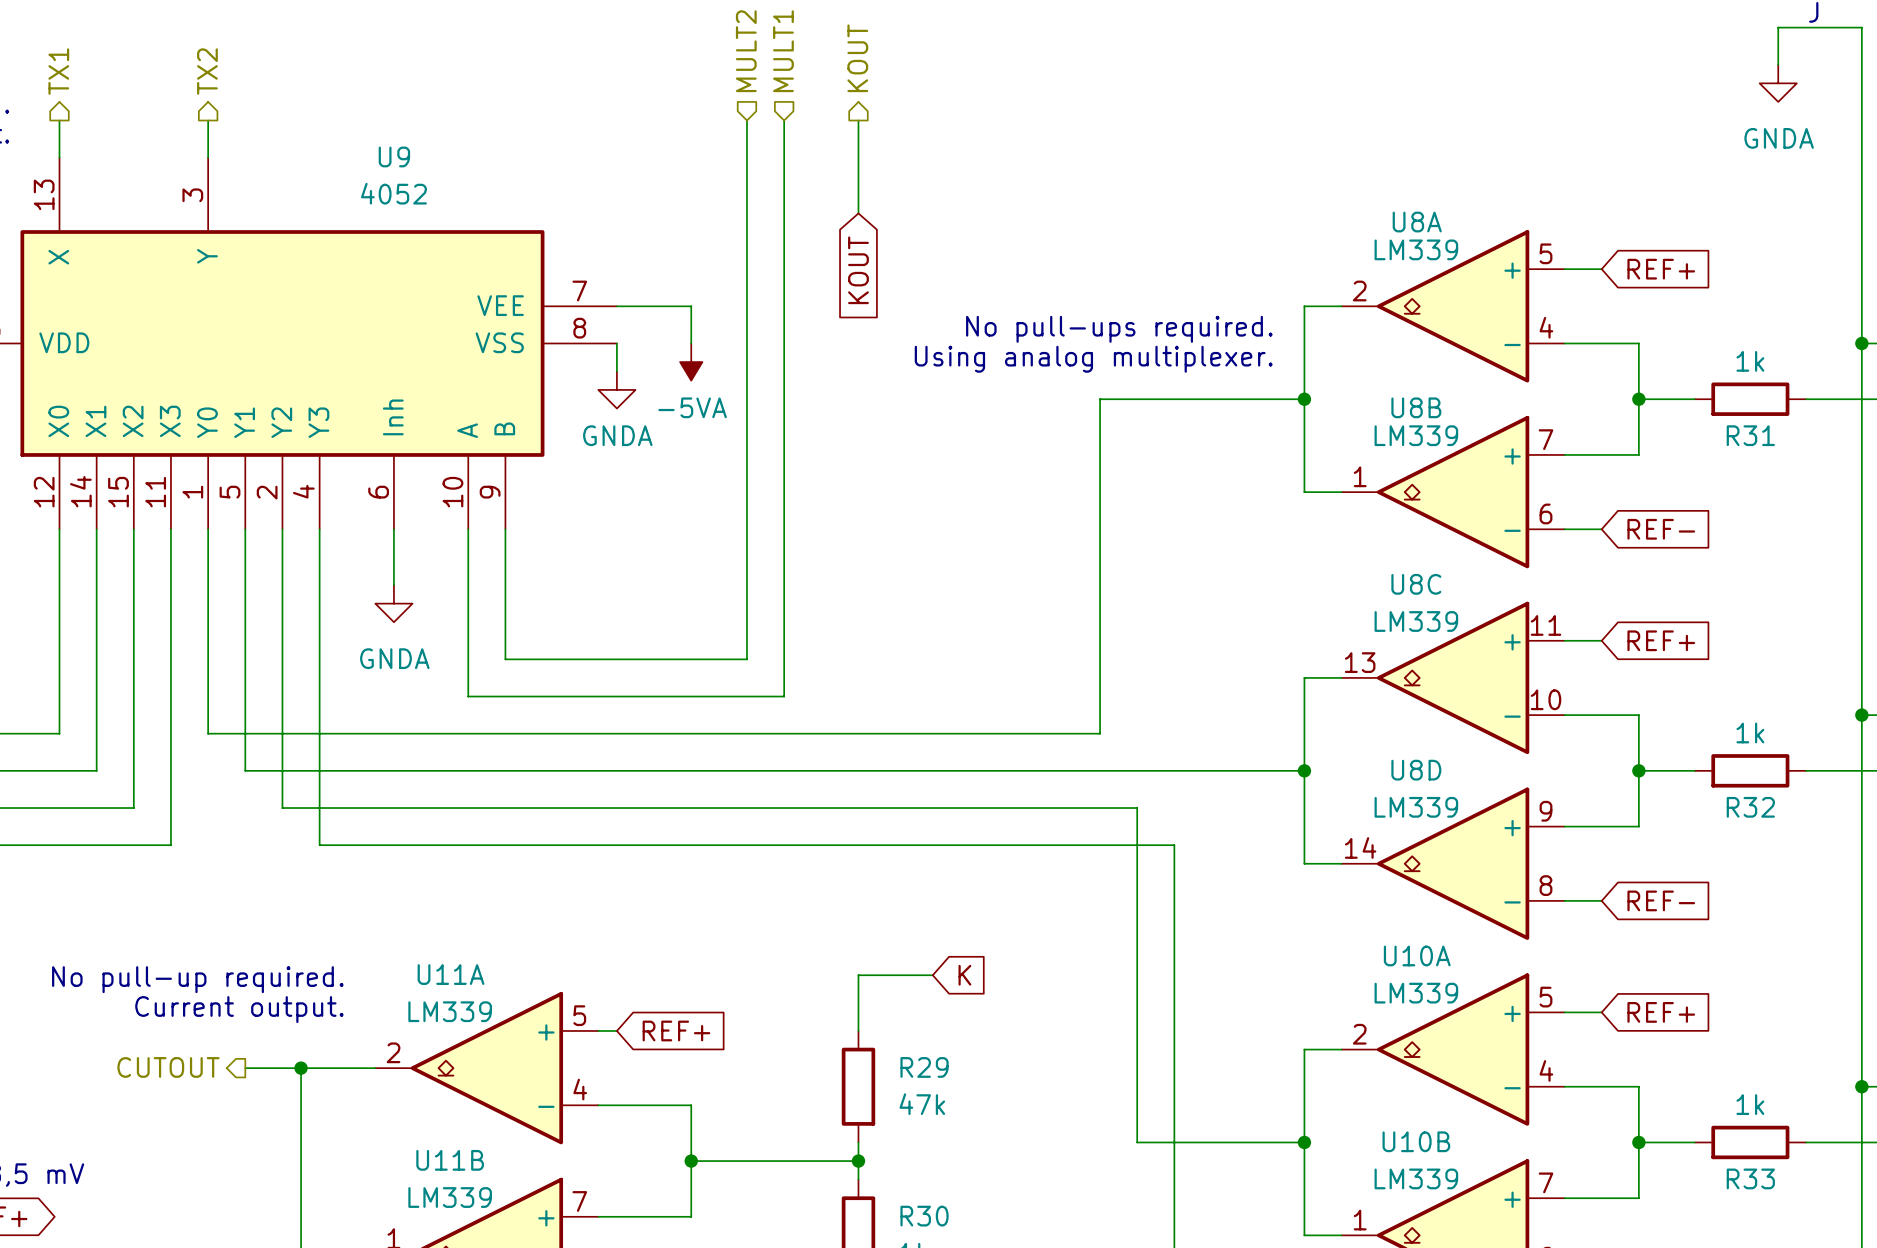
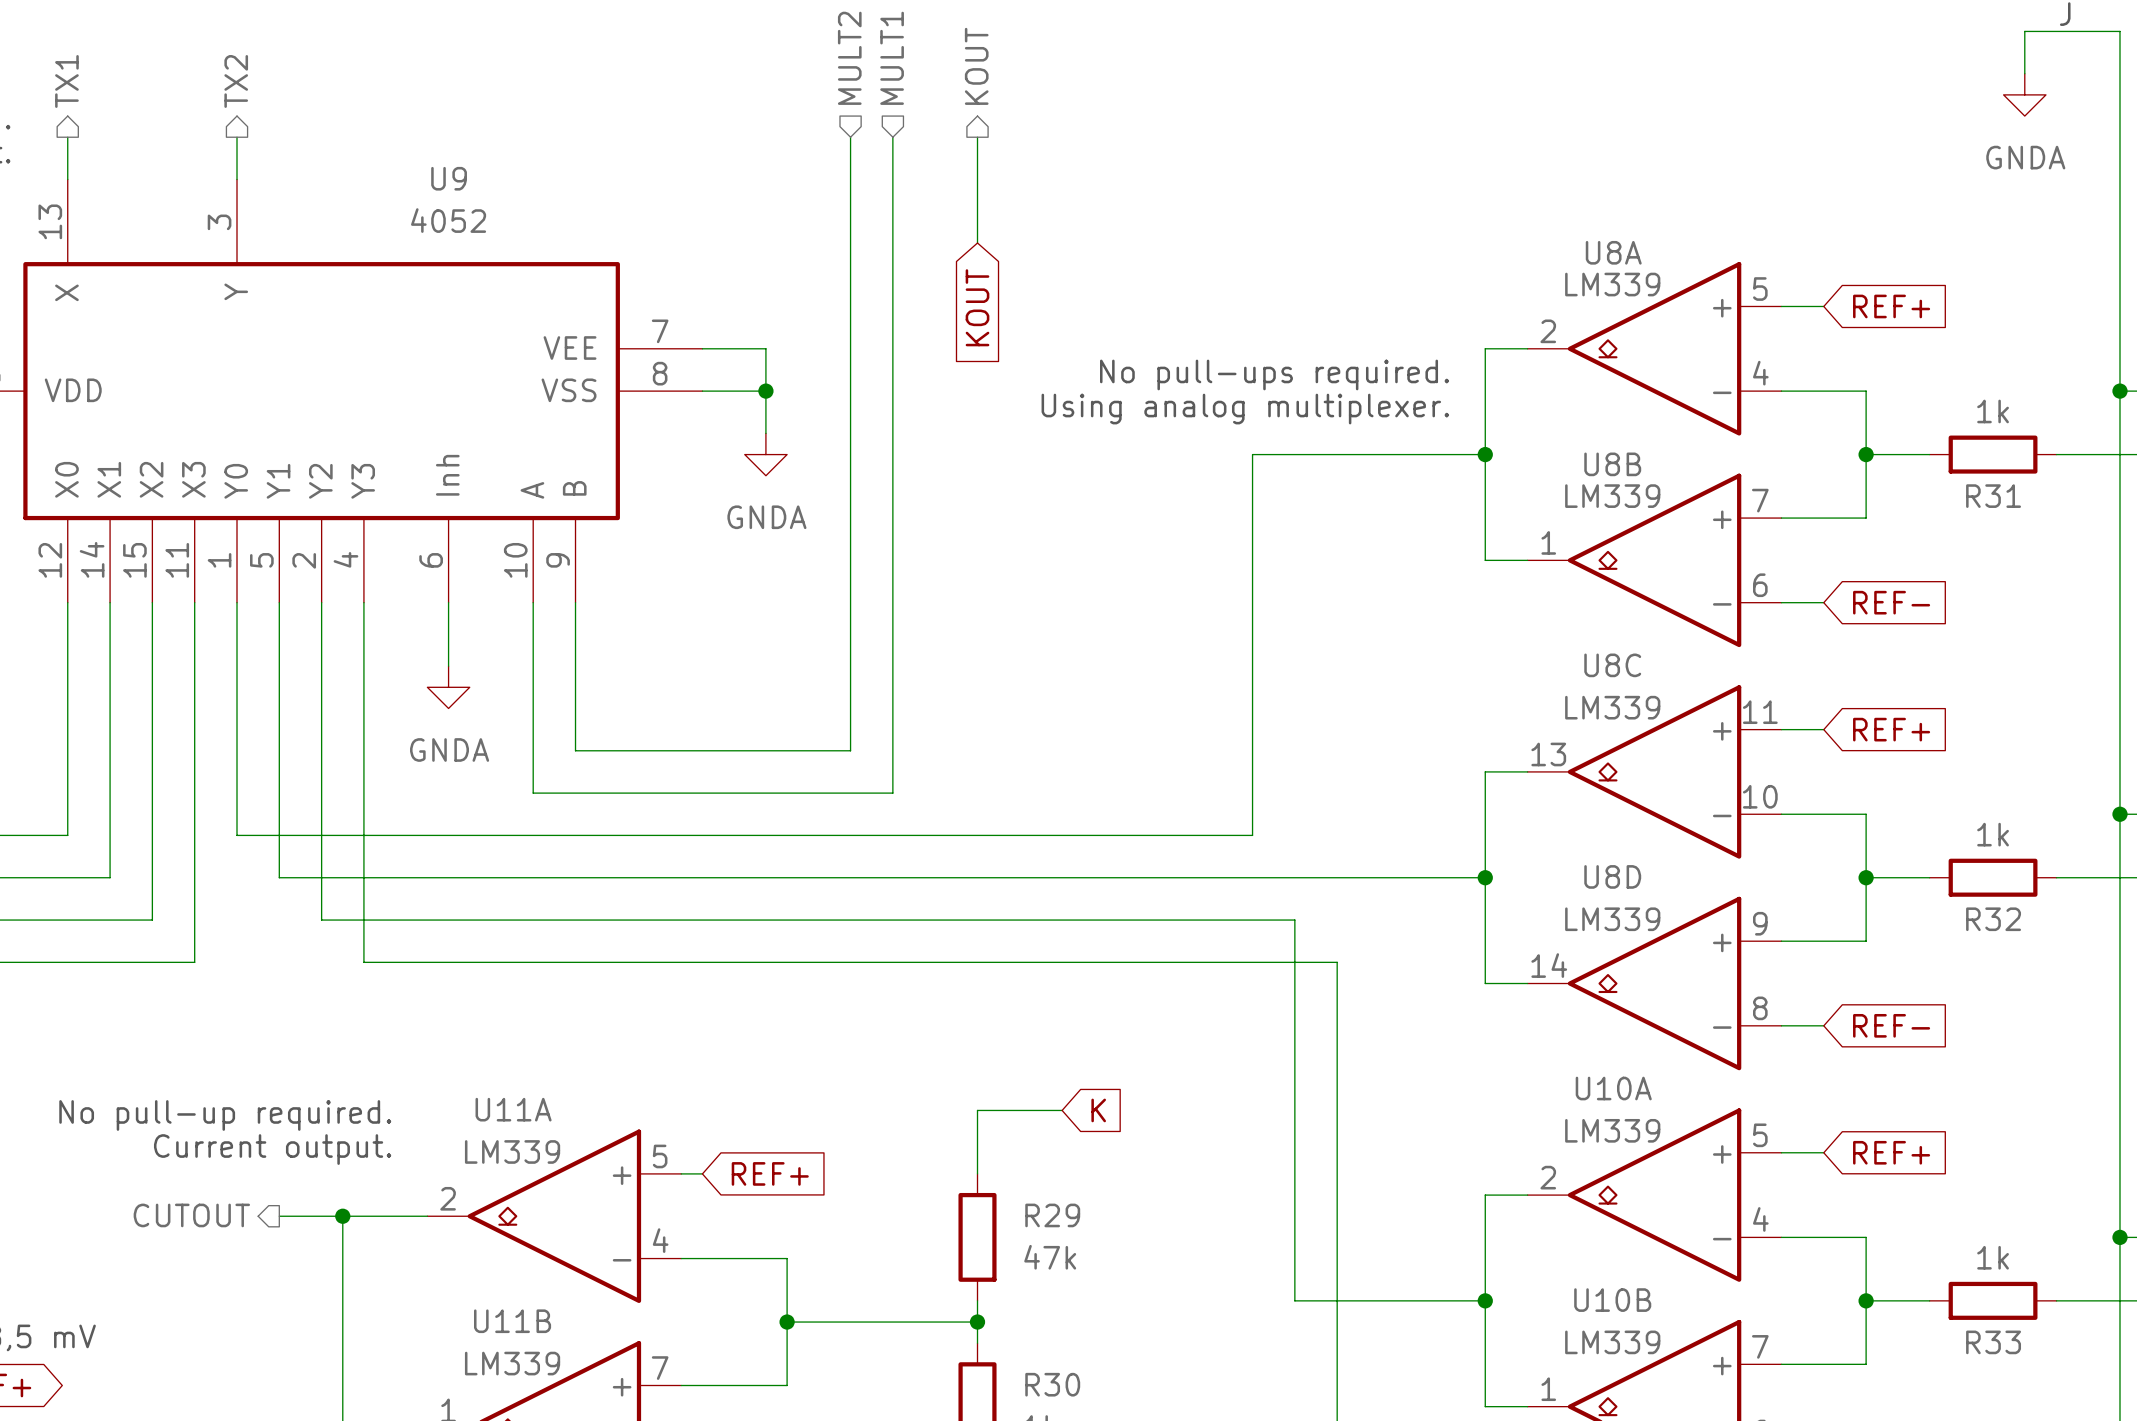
wire: (672, 306) (691, 306) (691, 343) -> (765, 348) (765, 433)
wire: (616, 343) (616, 371) -> (702, 391) (765, 391)
junction: none -> (765, 391)
power symbol: -5VA (691, 362) -> none
power symbol position: GNDA (616, 389) -> GNDA (765, 454)
power symbol text position: GNDA (617, 435) -> GNDA (766, 517)

